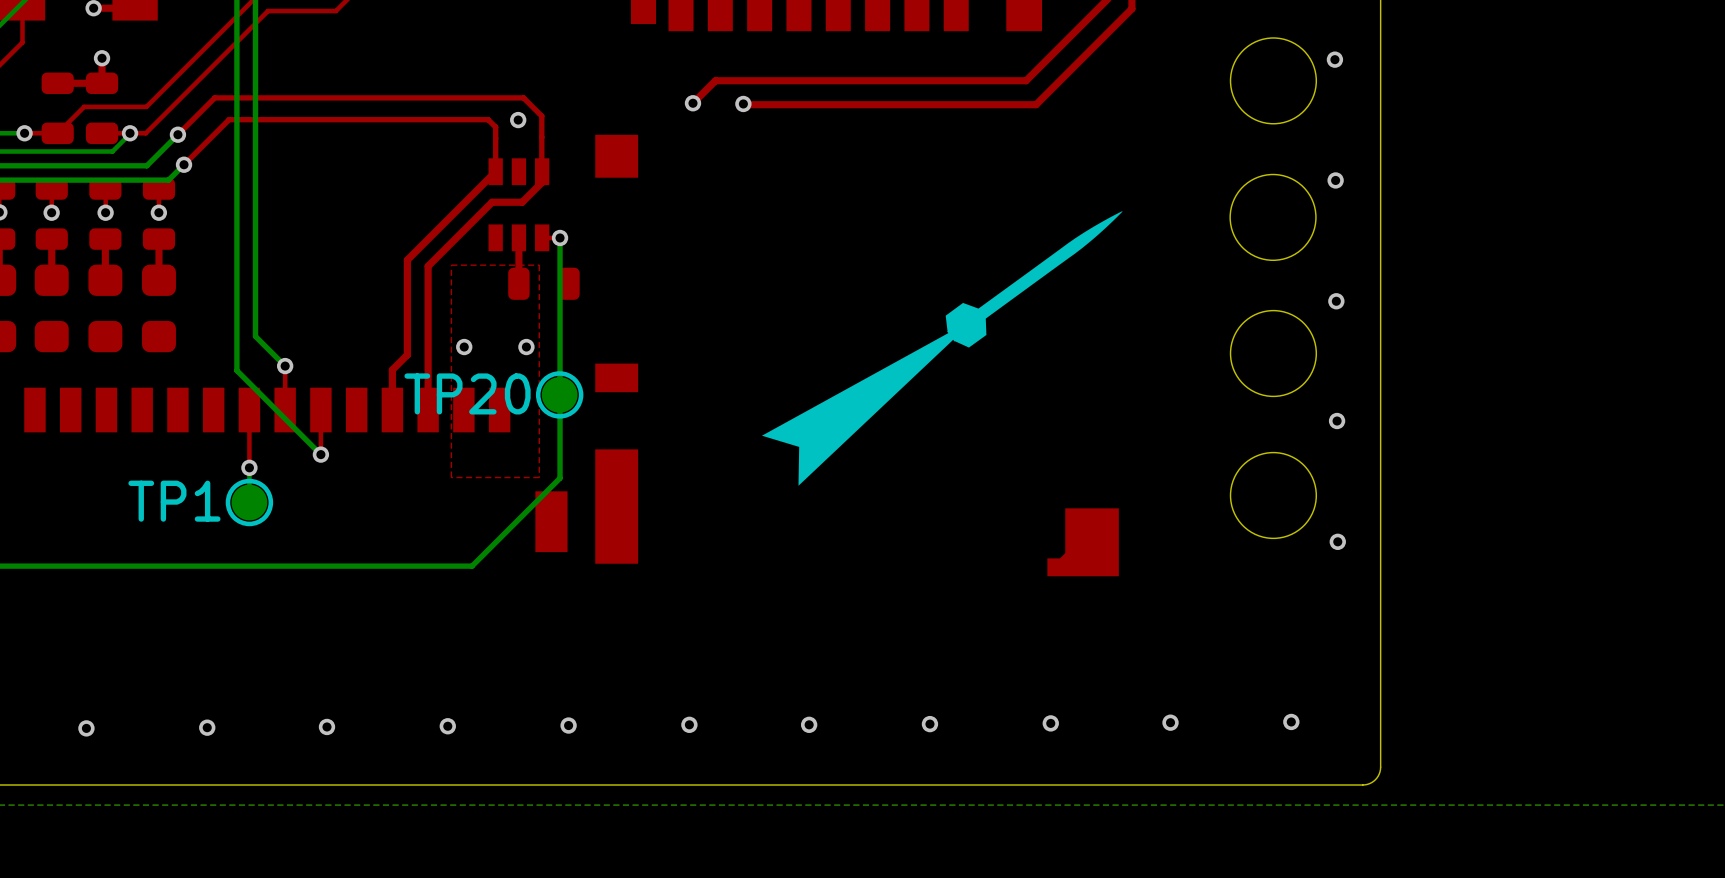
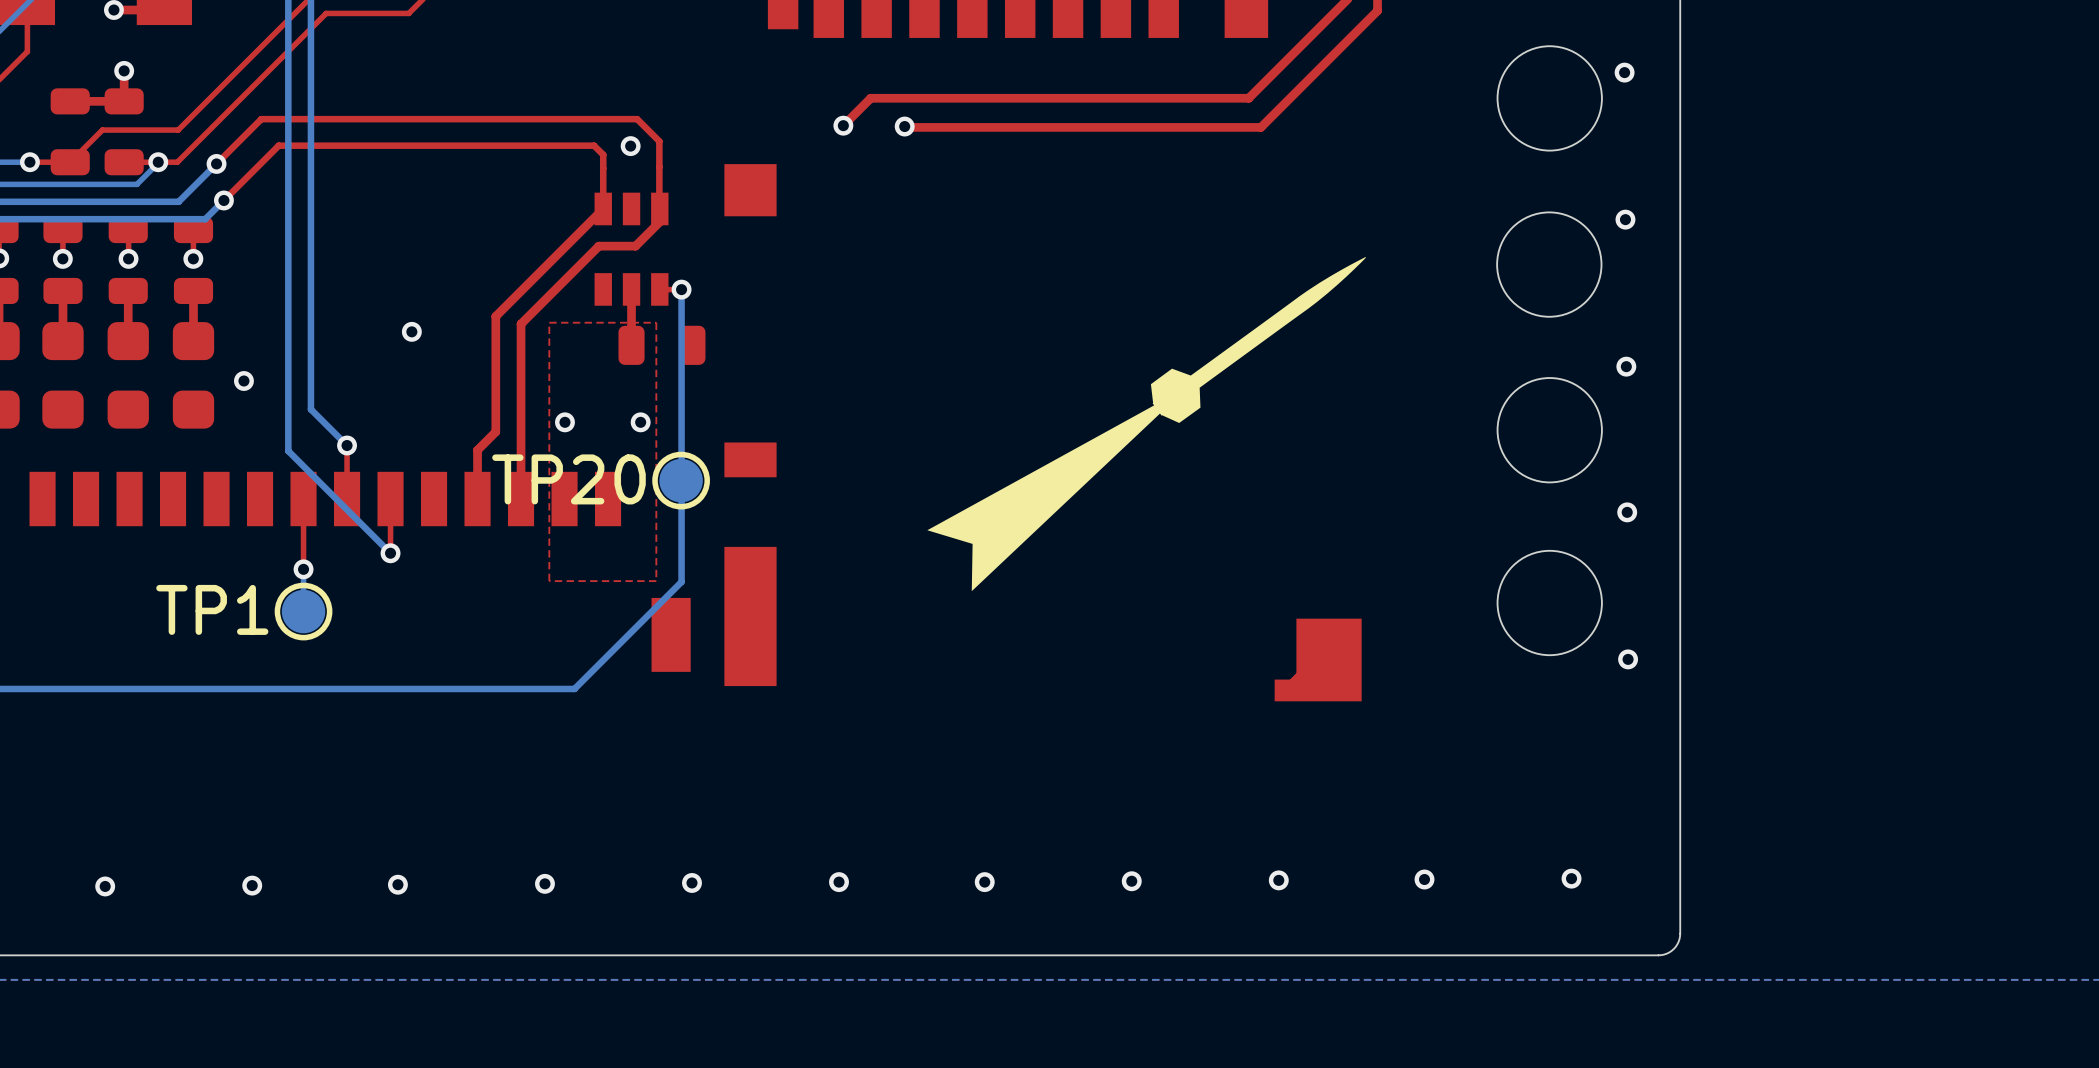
via: none -> (411, 331)
via: none -> (243, 381)

